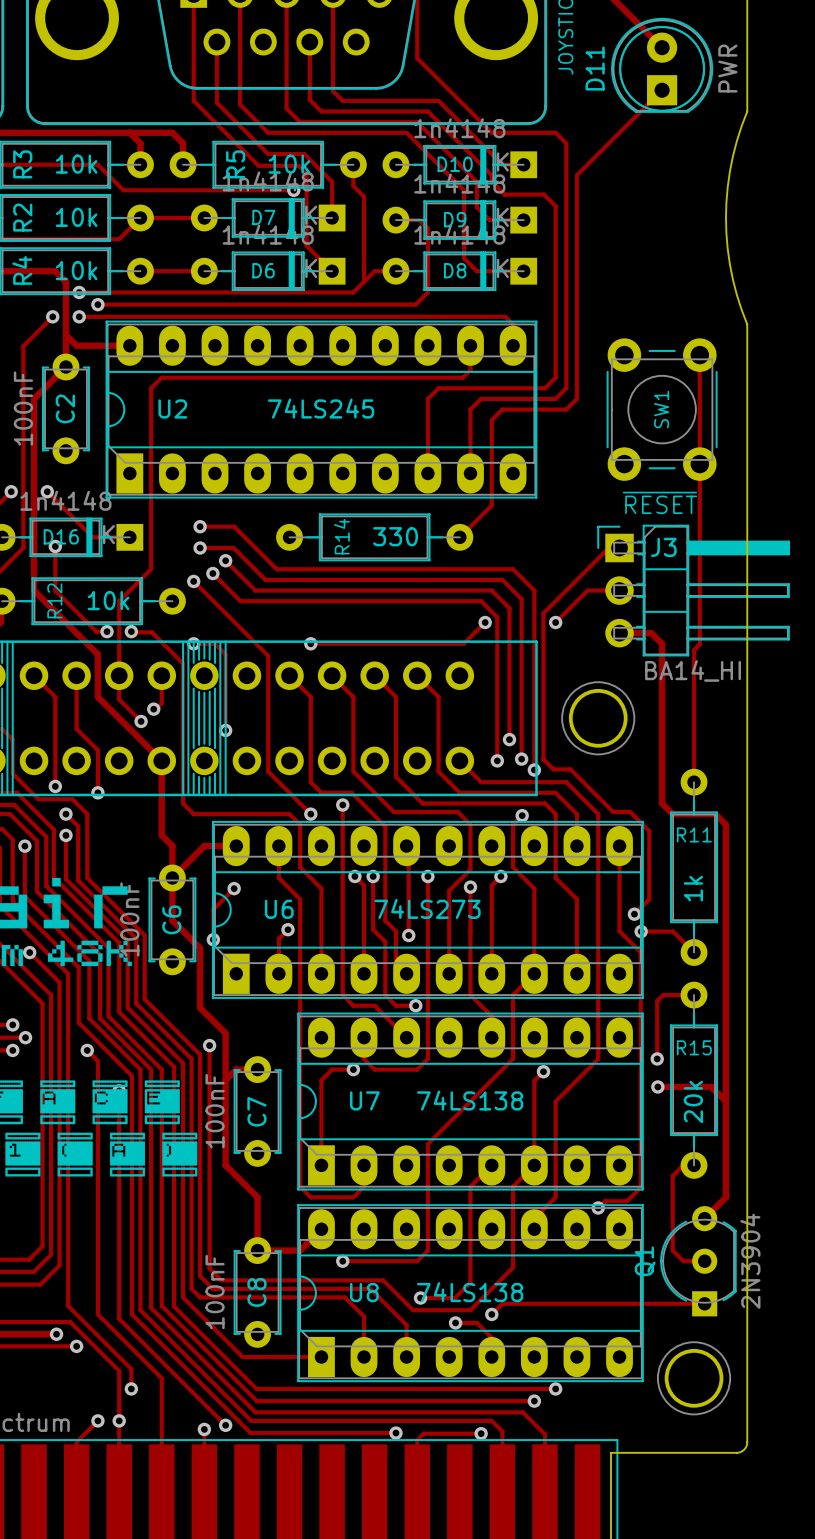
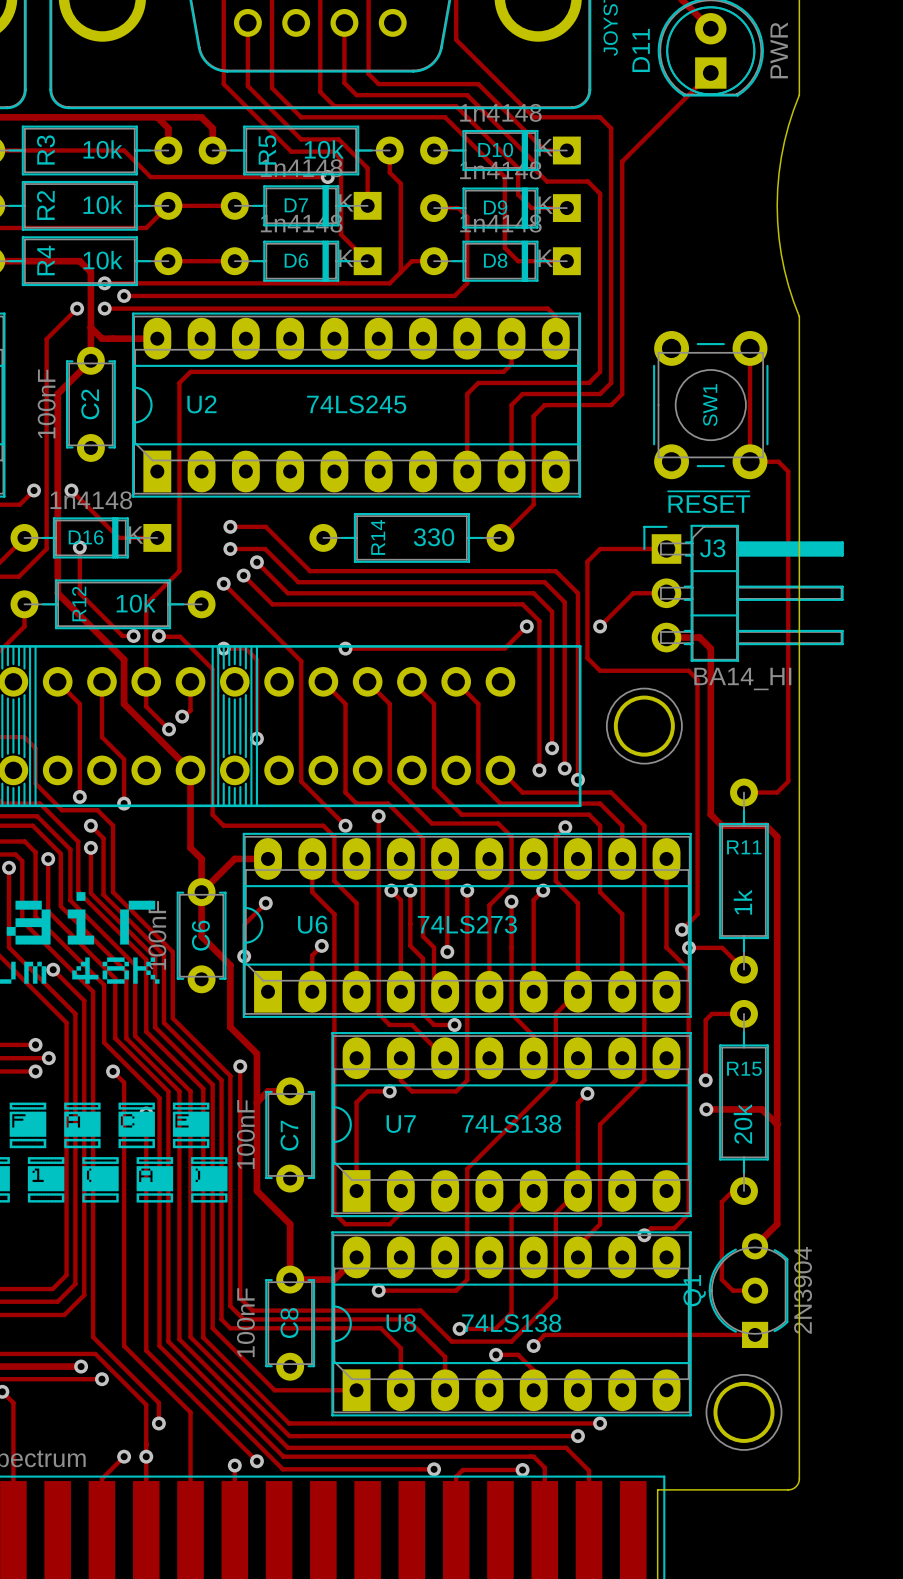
track: (699, 464) (699, 644) (694, 650) (694, 782) -> (750, 461) (778, 461) (788, 471) (788, 781) (777, 792) (744, 792)
track: (608, 547) (543, 613) -> (655, 549) (600, 549) (587, 561) (587, 616)
track: (543, 652) (543, 759) (553, 769) (570, 769) (613, 811) (630, 811) (649, 831) -> (587, 658) (600, 670) (688, 670) (697, 679) (697, 843)

